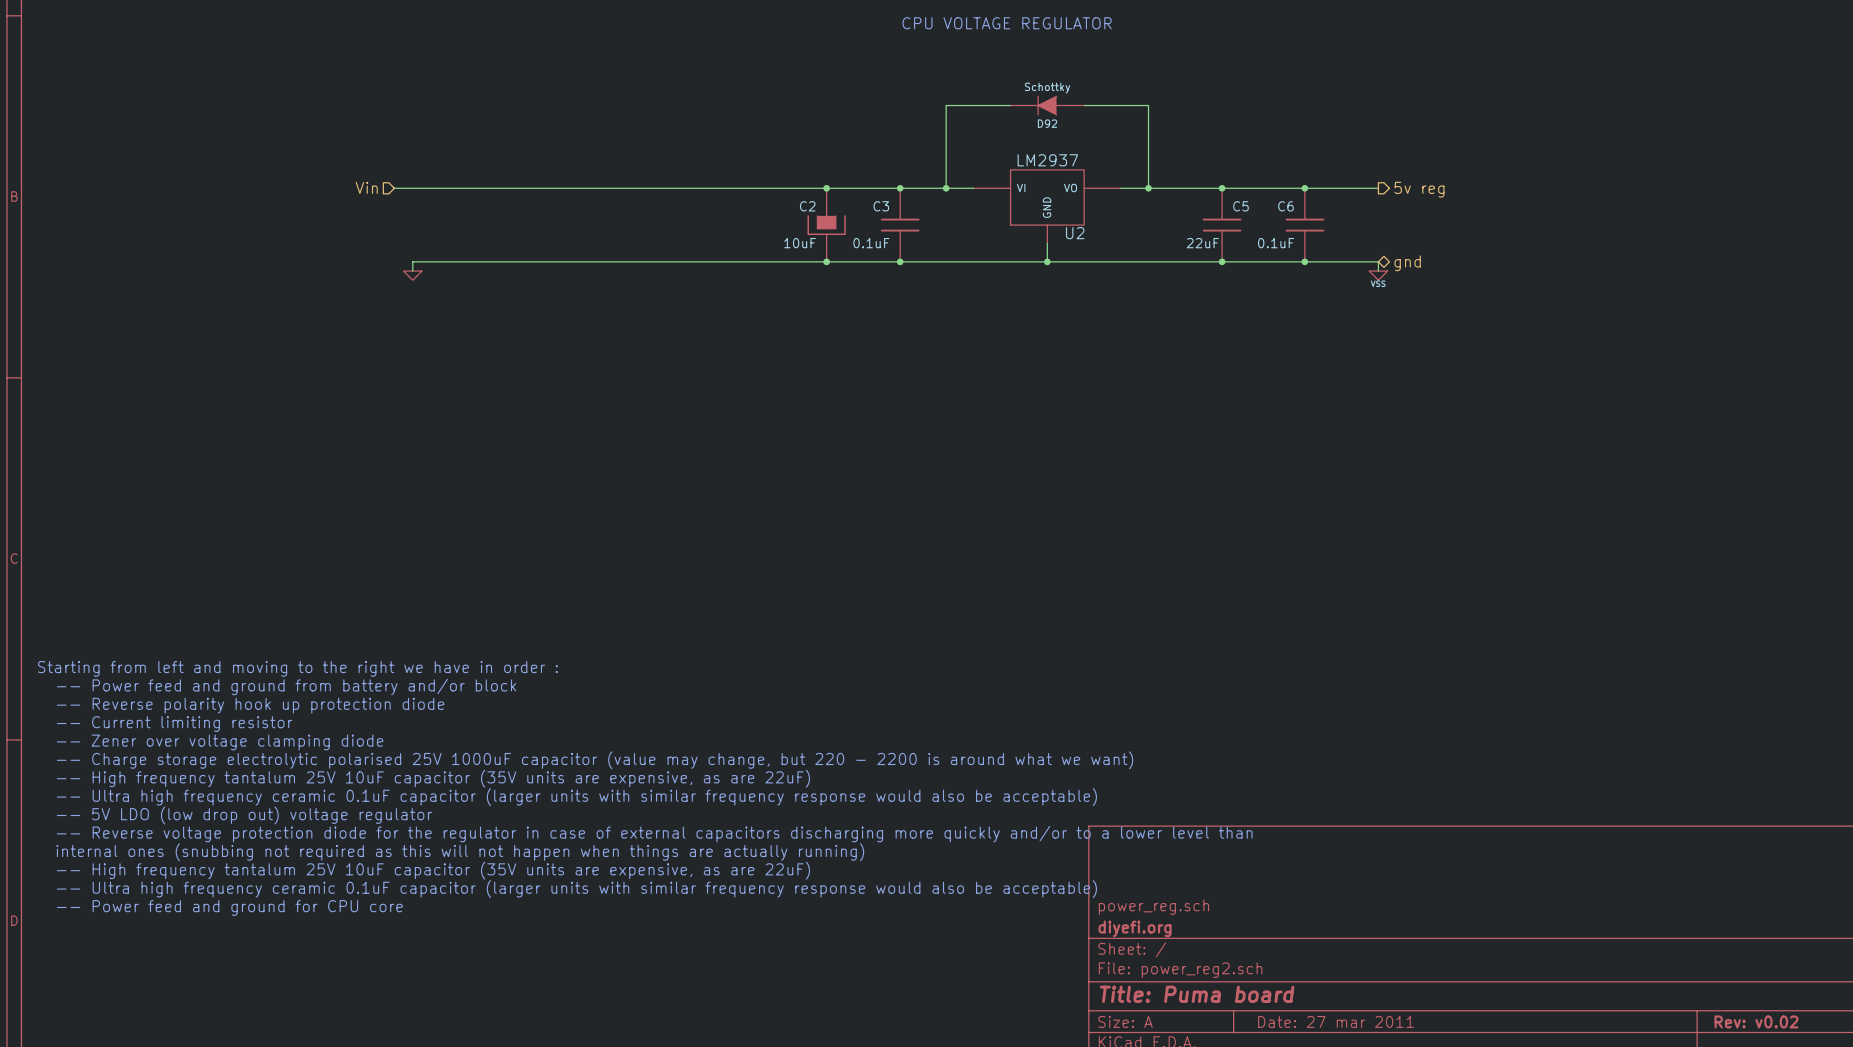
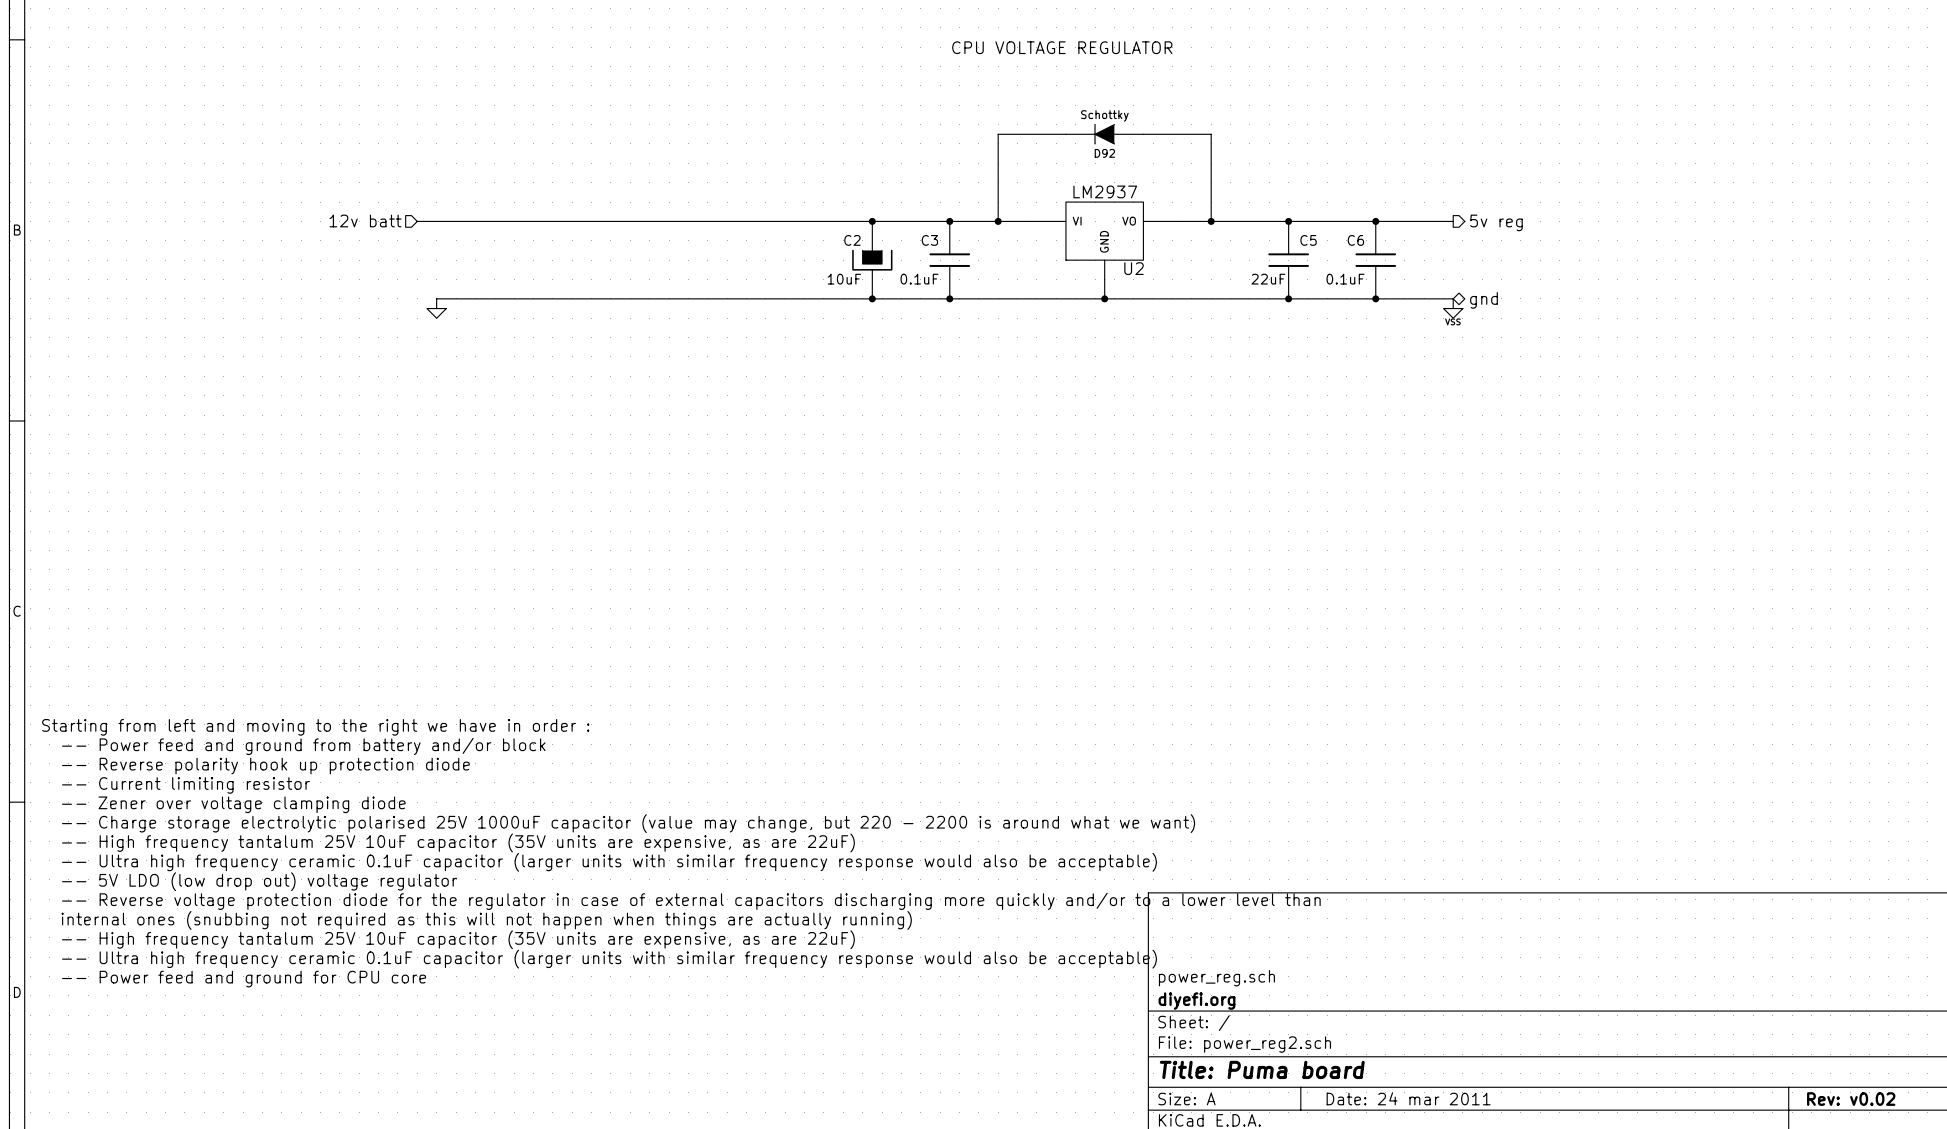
hierarchical label: Vin (366, 187) -> 12v batt (365, 220)
title block: Date: 27 mar 2011 (1336, 1021) -> Date: 24 mar 2011 (1408, 1098)

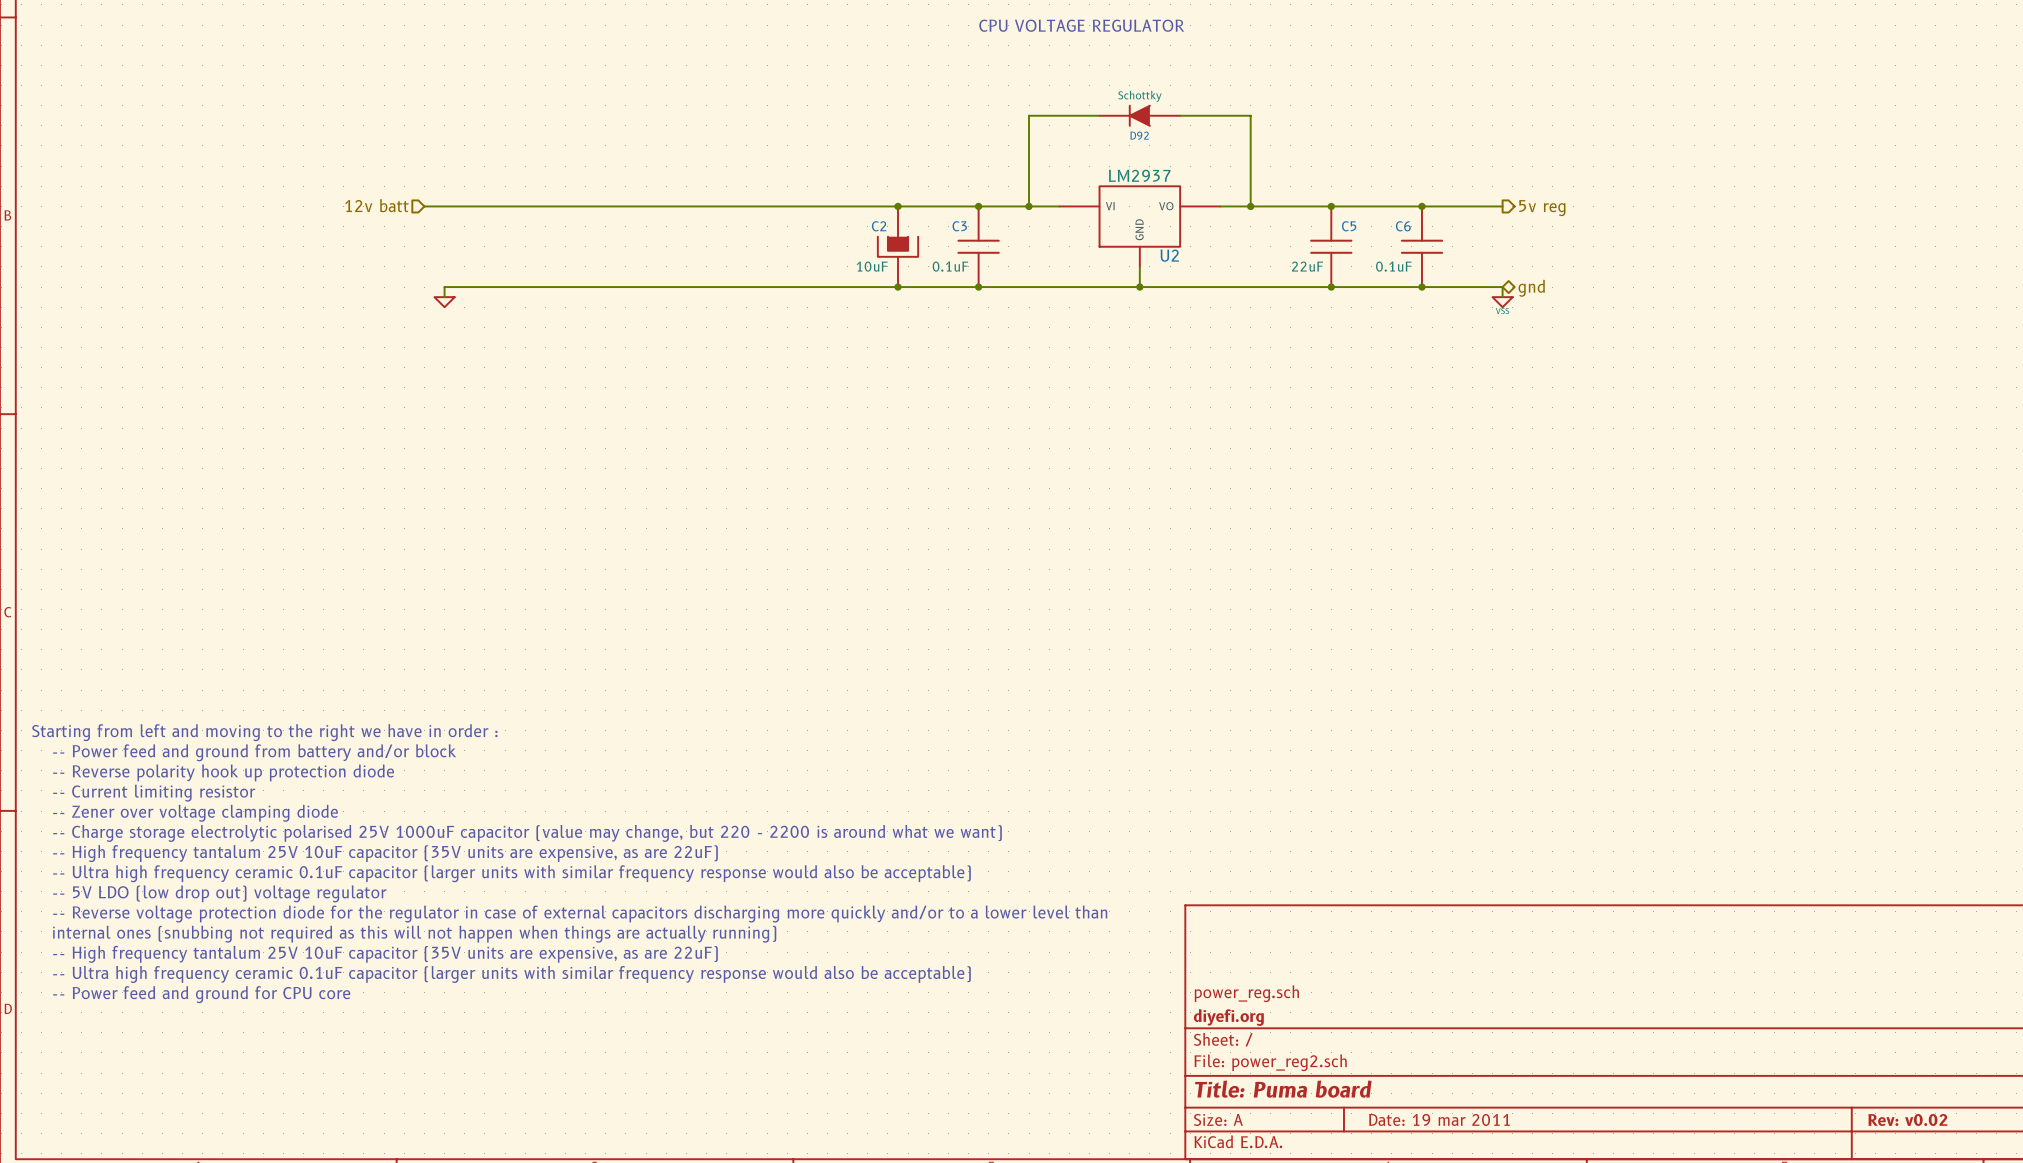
title block: Date: 24 mar 2011 (1408, 1098) -> Date: 19 mar 2011 (1439, 1119)

